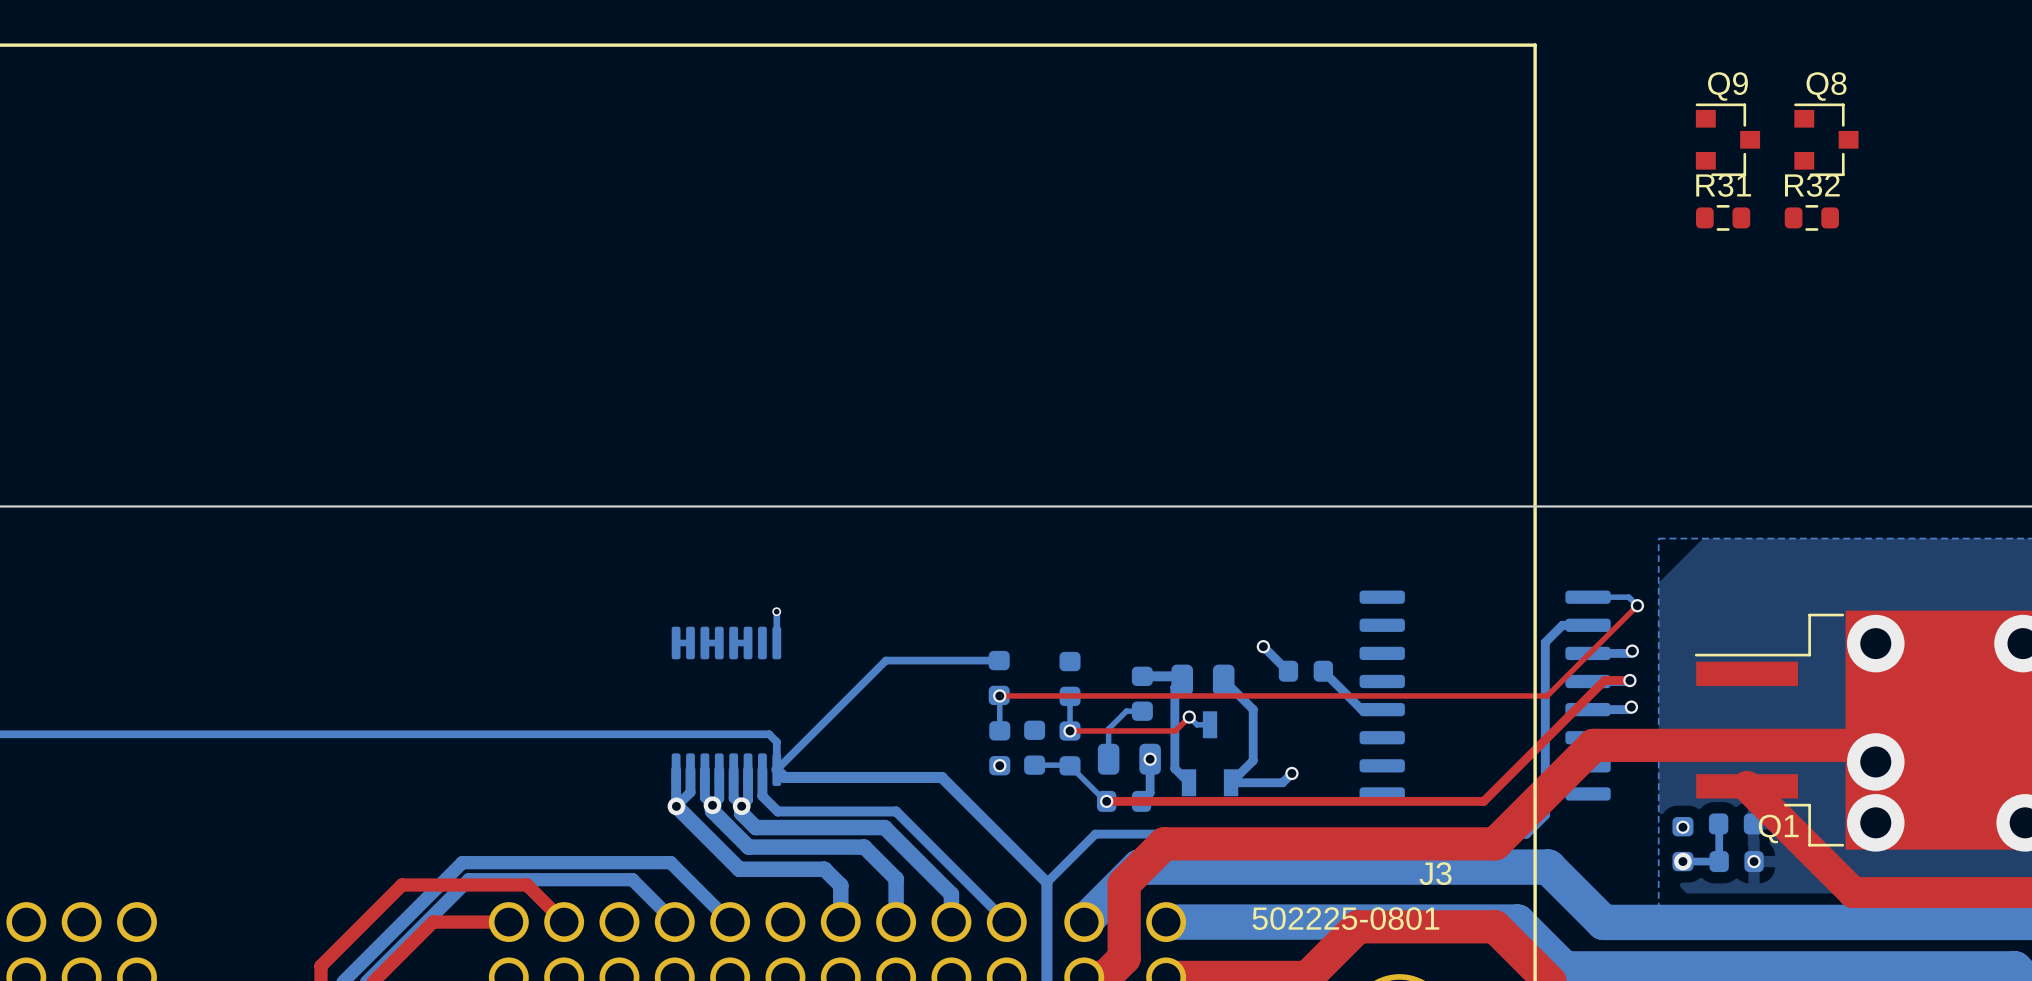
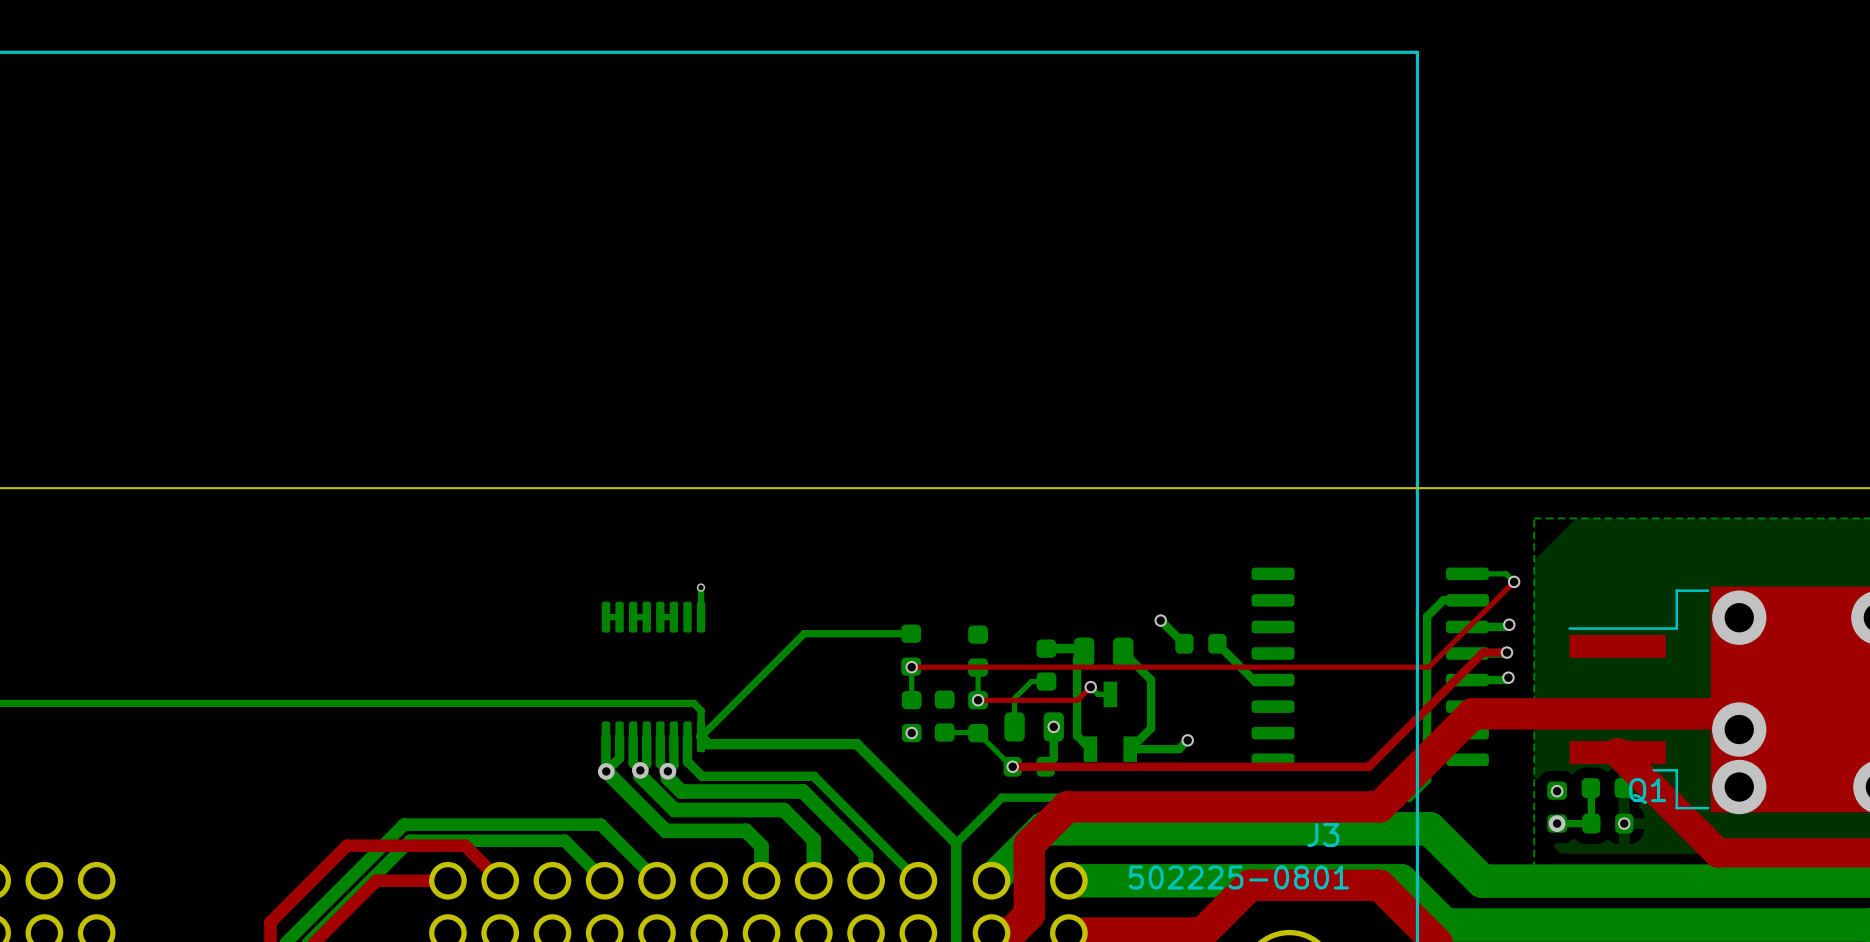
Q9: (1727, 139) -> none
Q8: (1826, 139) -> none
R31: (1723, 217) -> none
R32: (1811, 217) -> none

